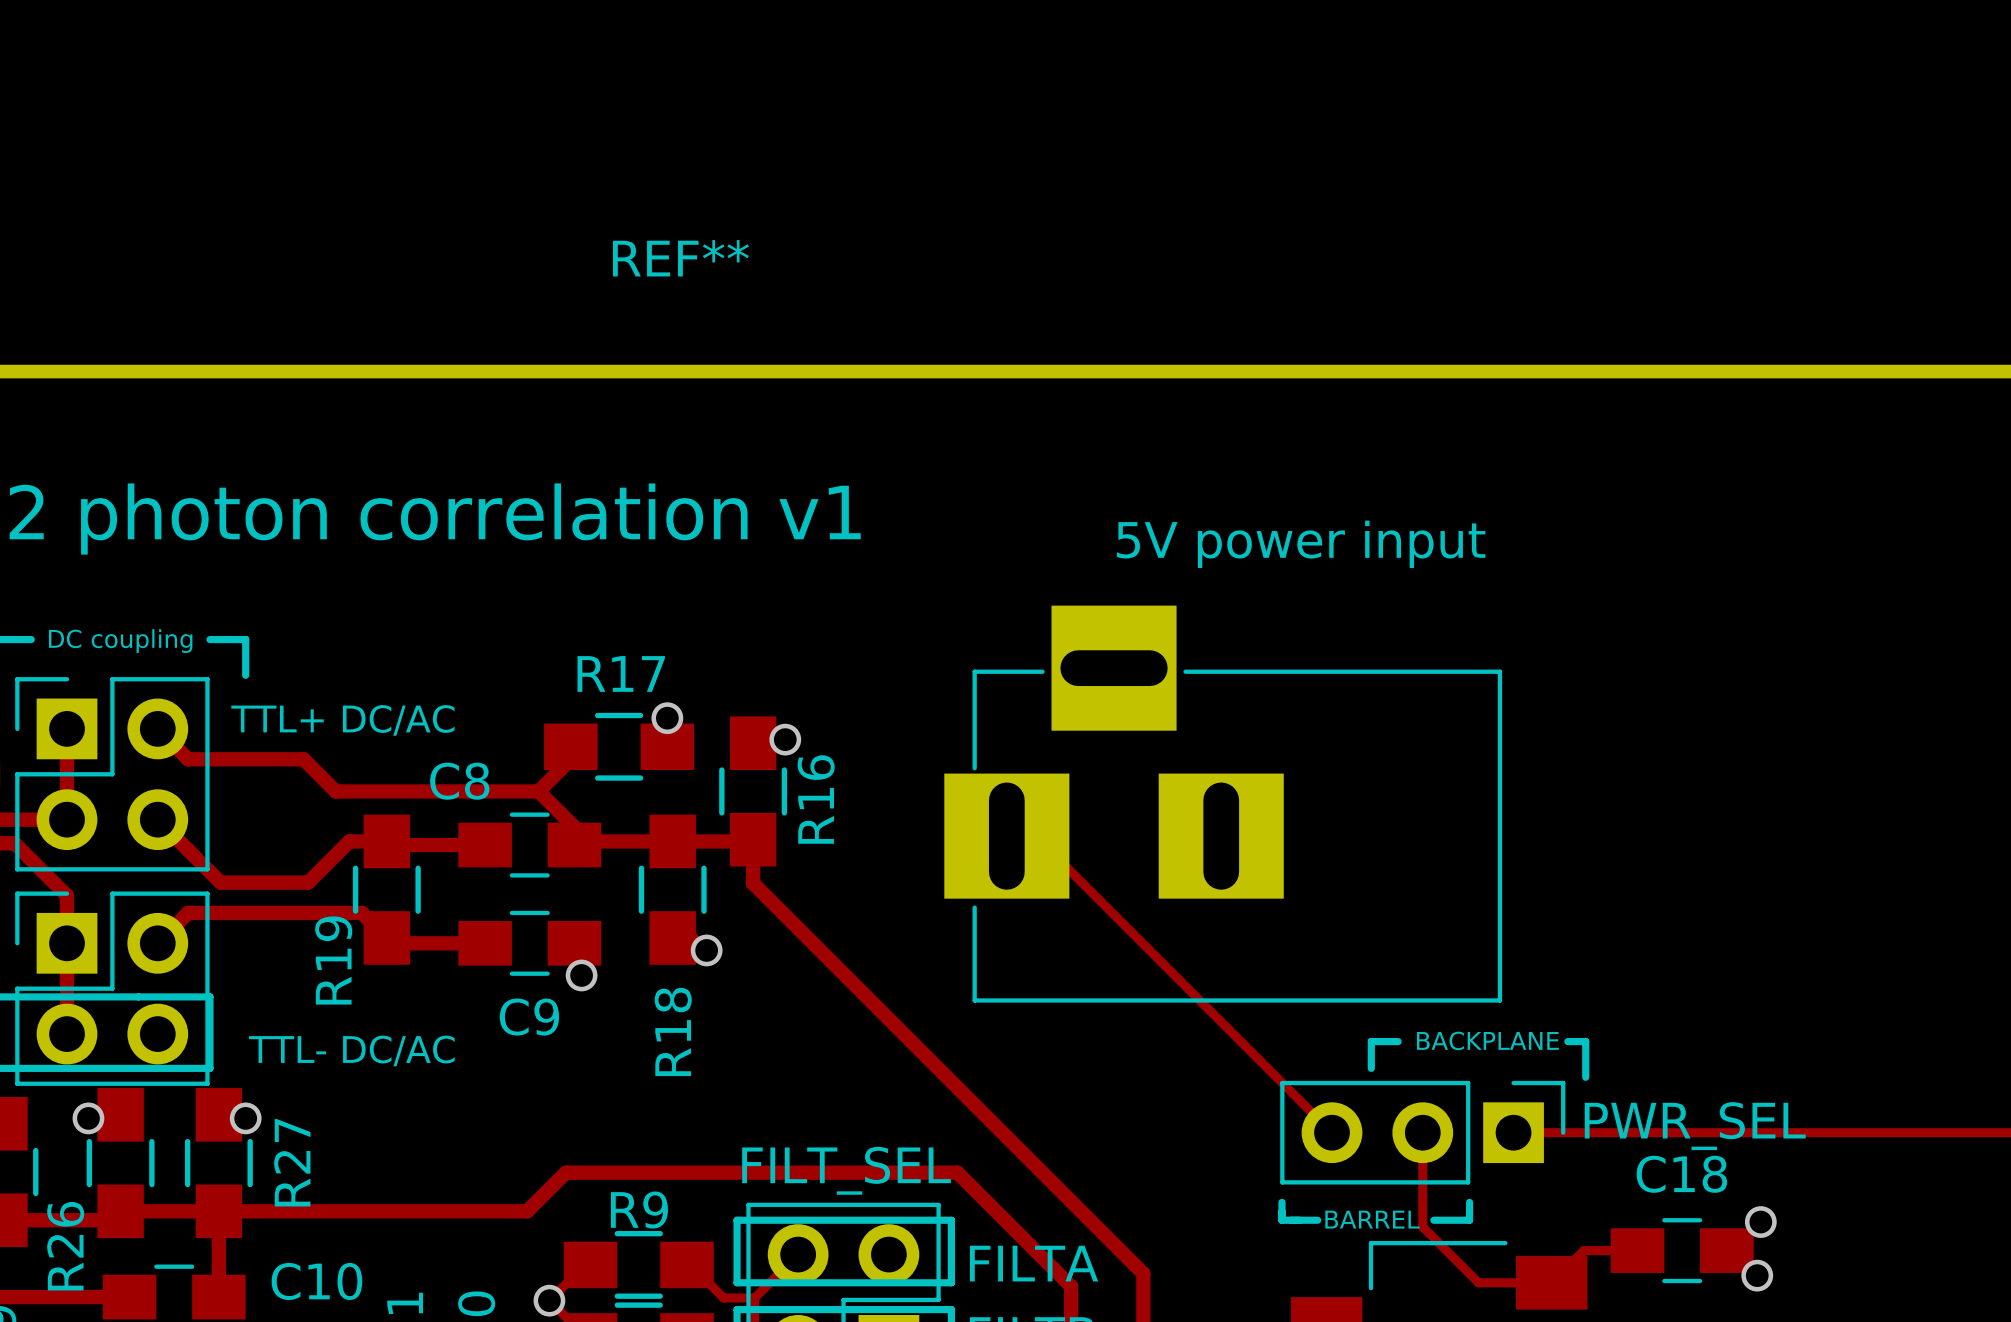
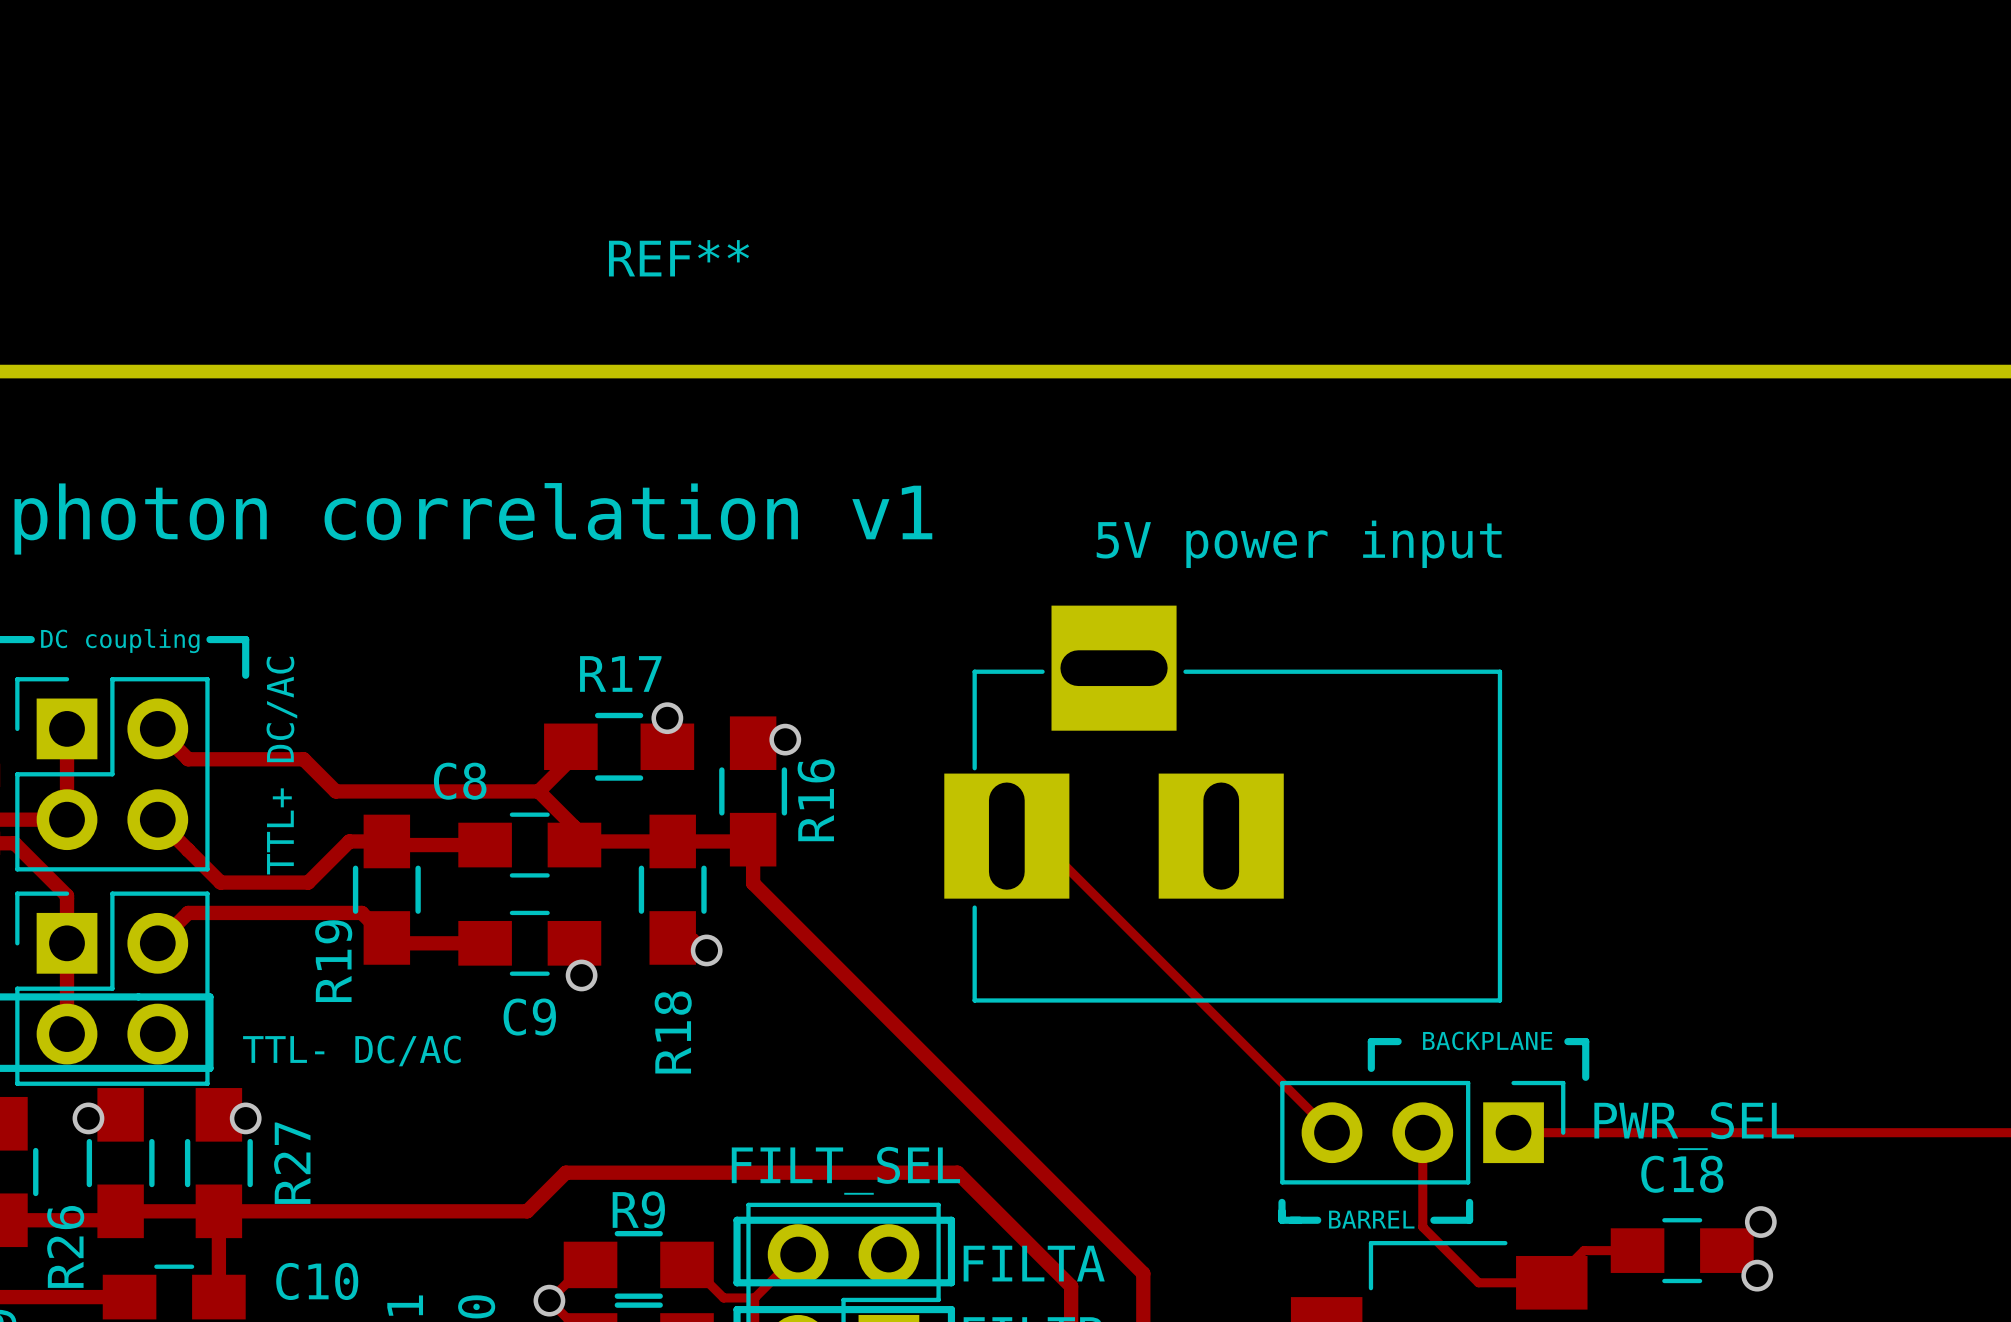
text: TTL+ DC/AC (342, 720) -> none
part value: none -> TTL+ DC/AC (281, 765)

